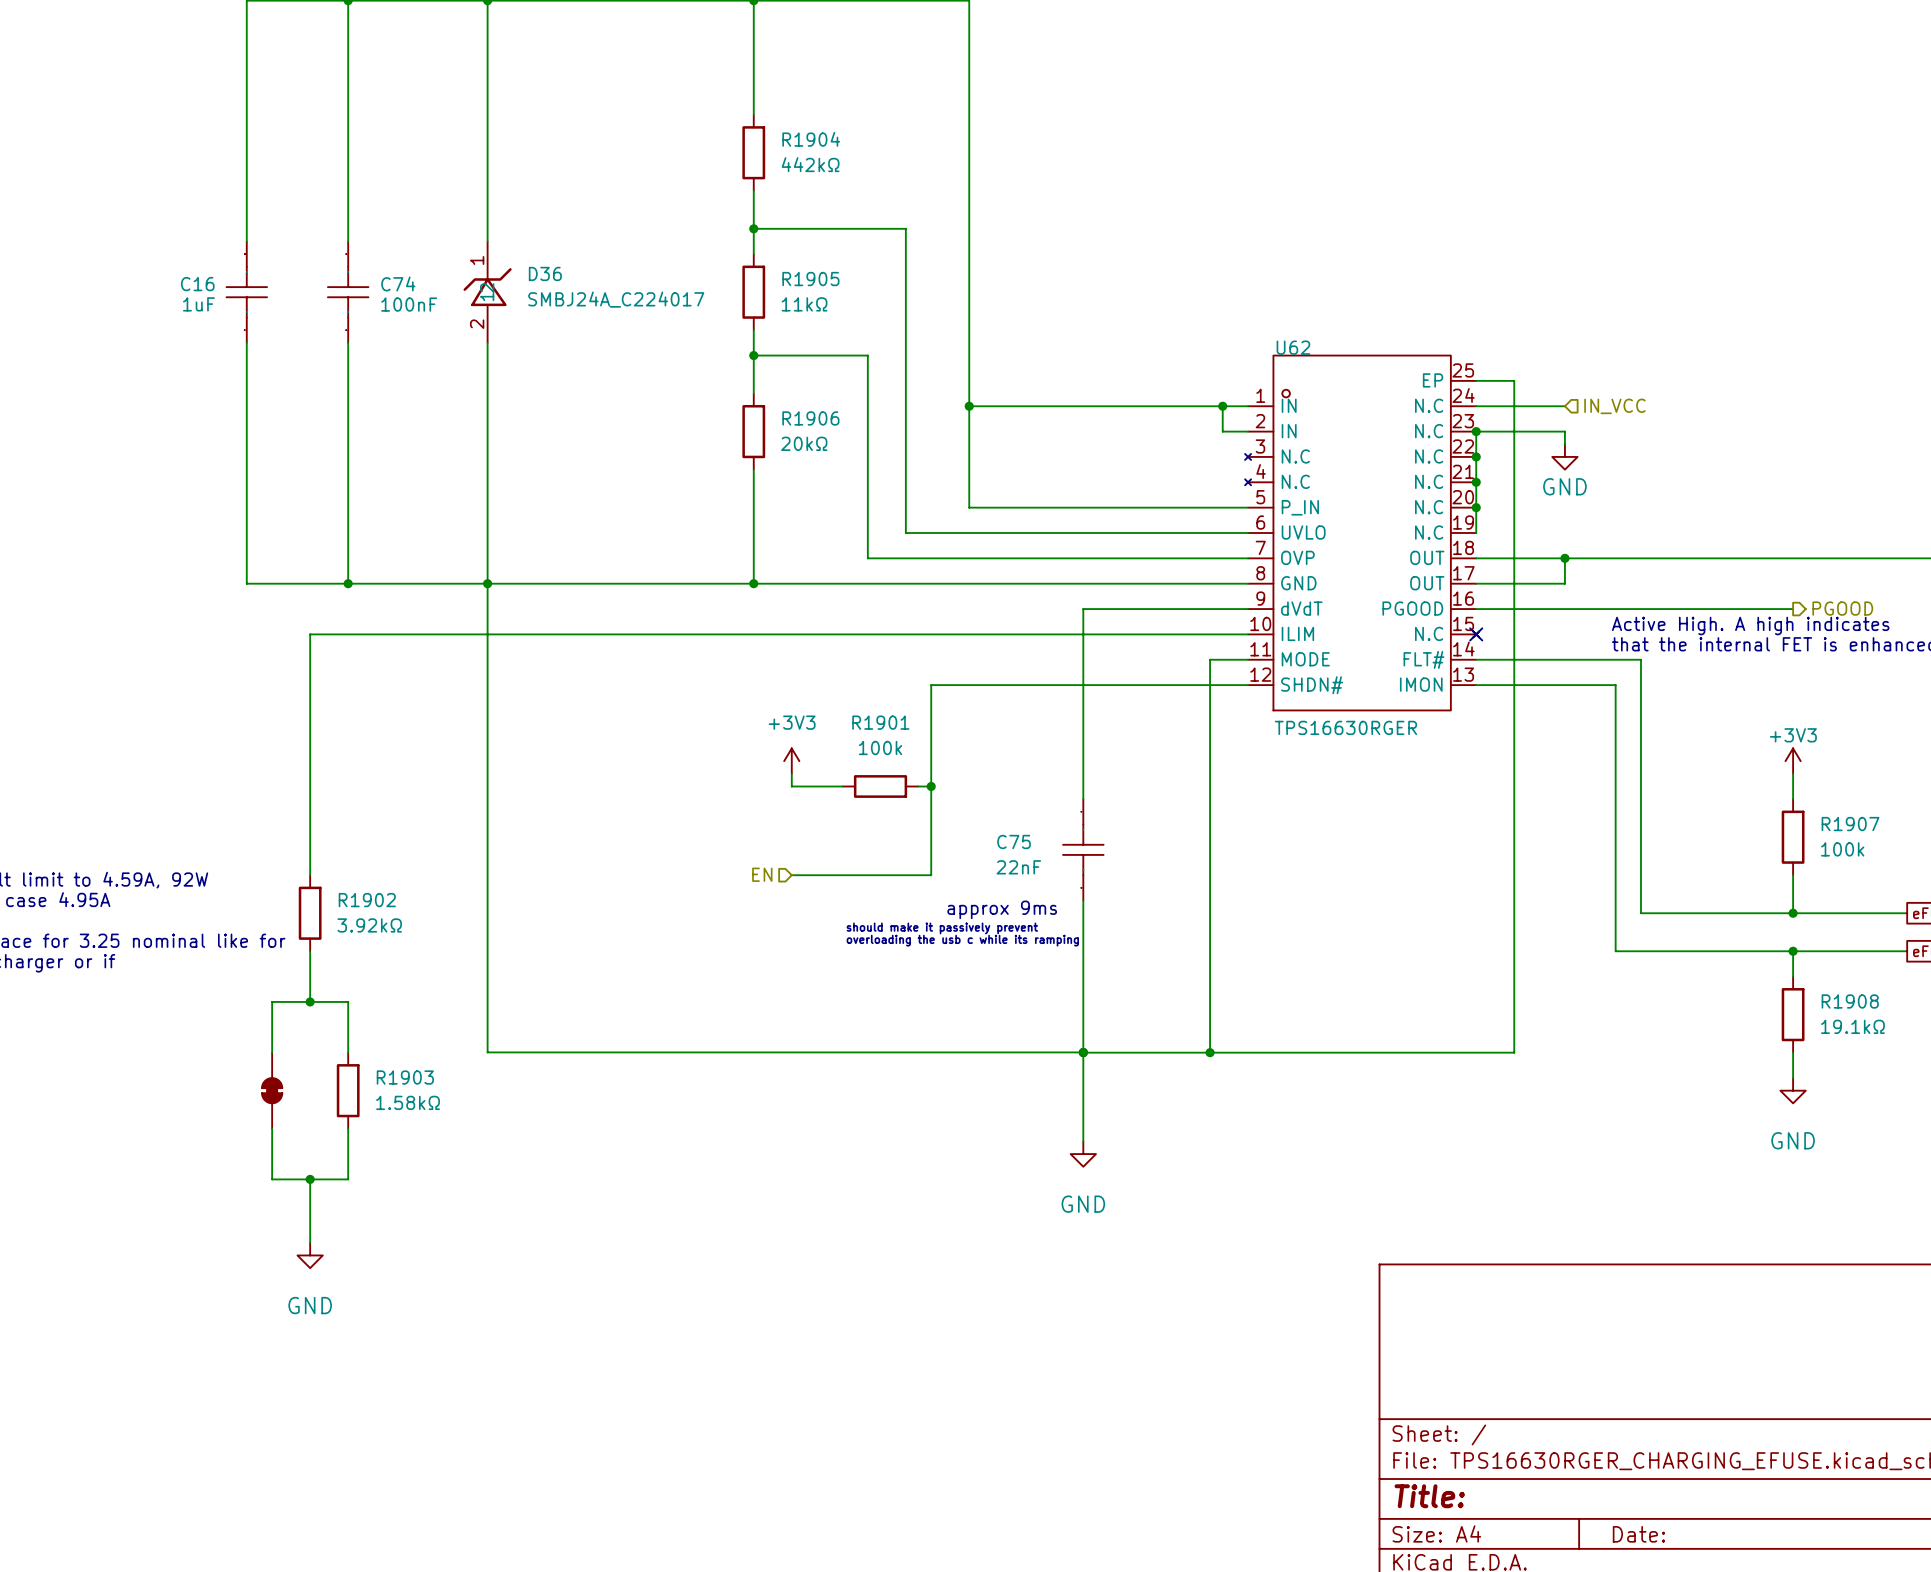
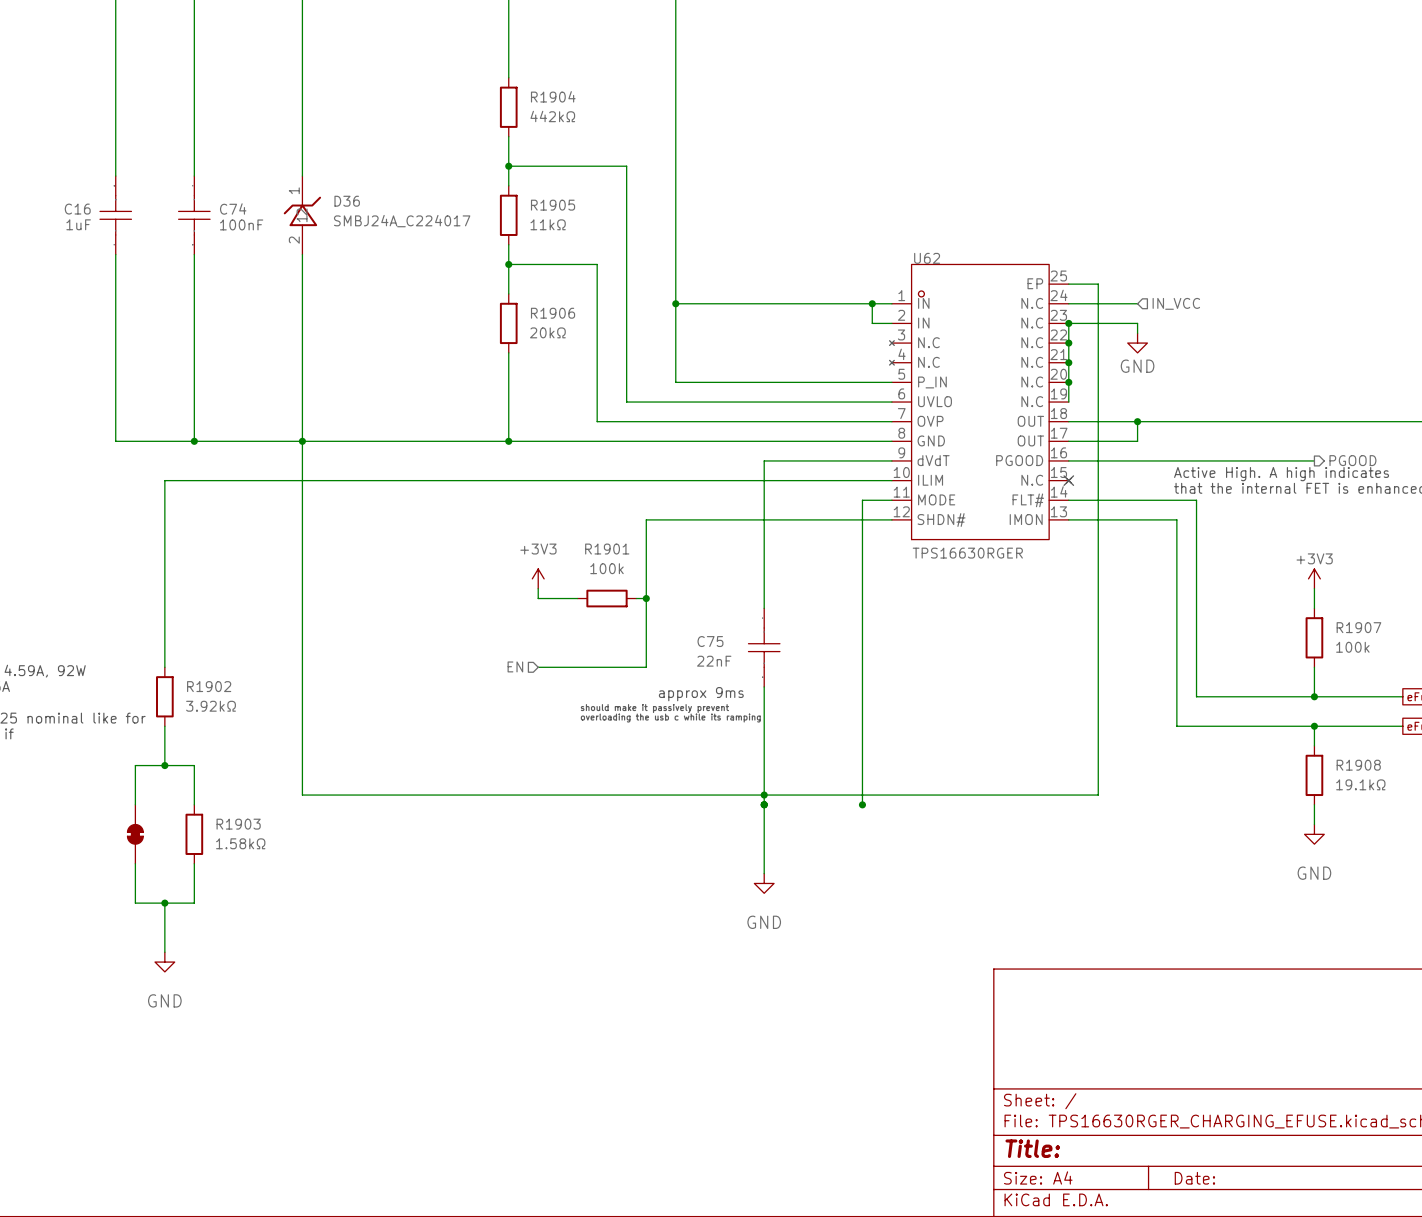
wire: (487, 1039) (487, 1052) (1083, 1052) -> (302, 795) (1098, 795)
junction: none -> (764, 795)
wire: (1514, 1039) (1514, 1052) (1083, 1052) -> none

